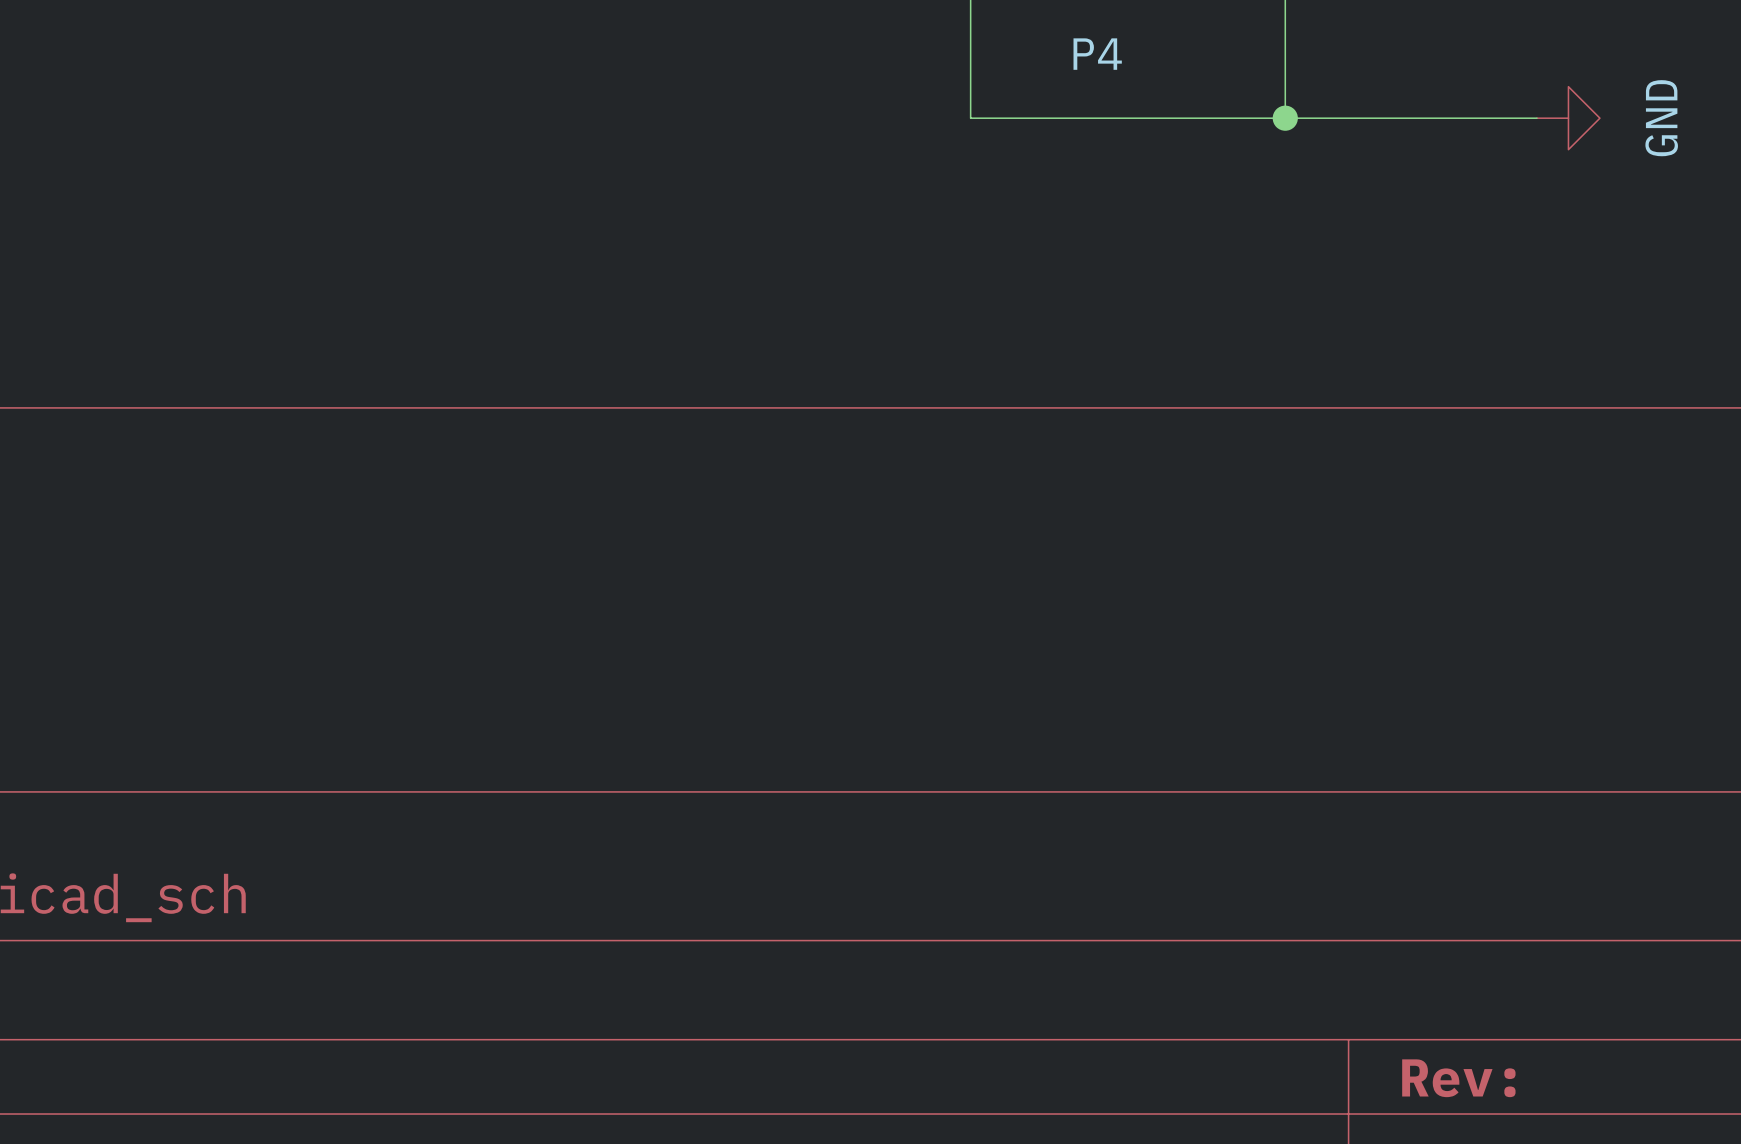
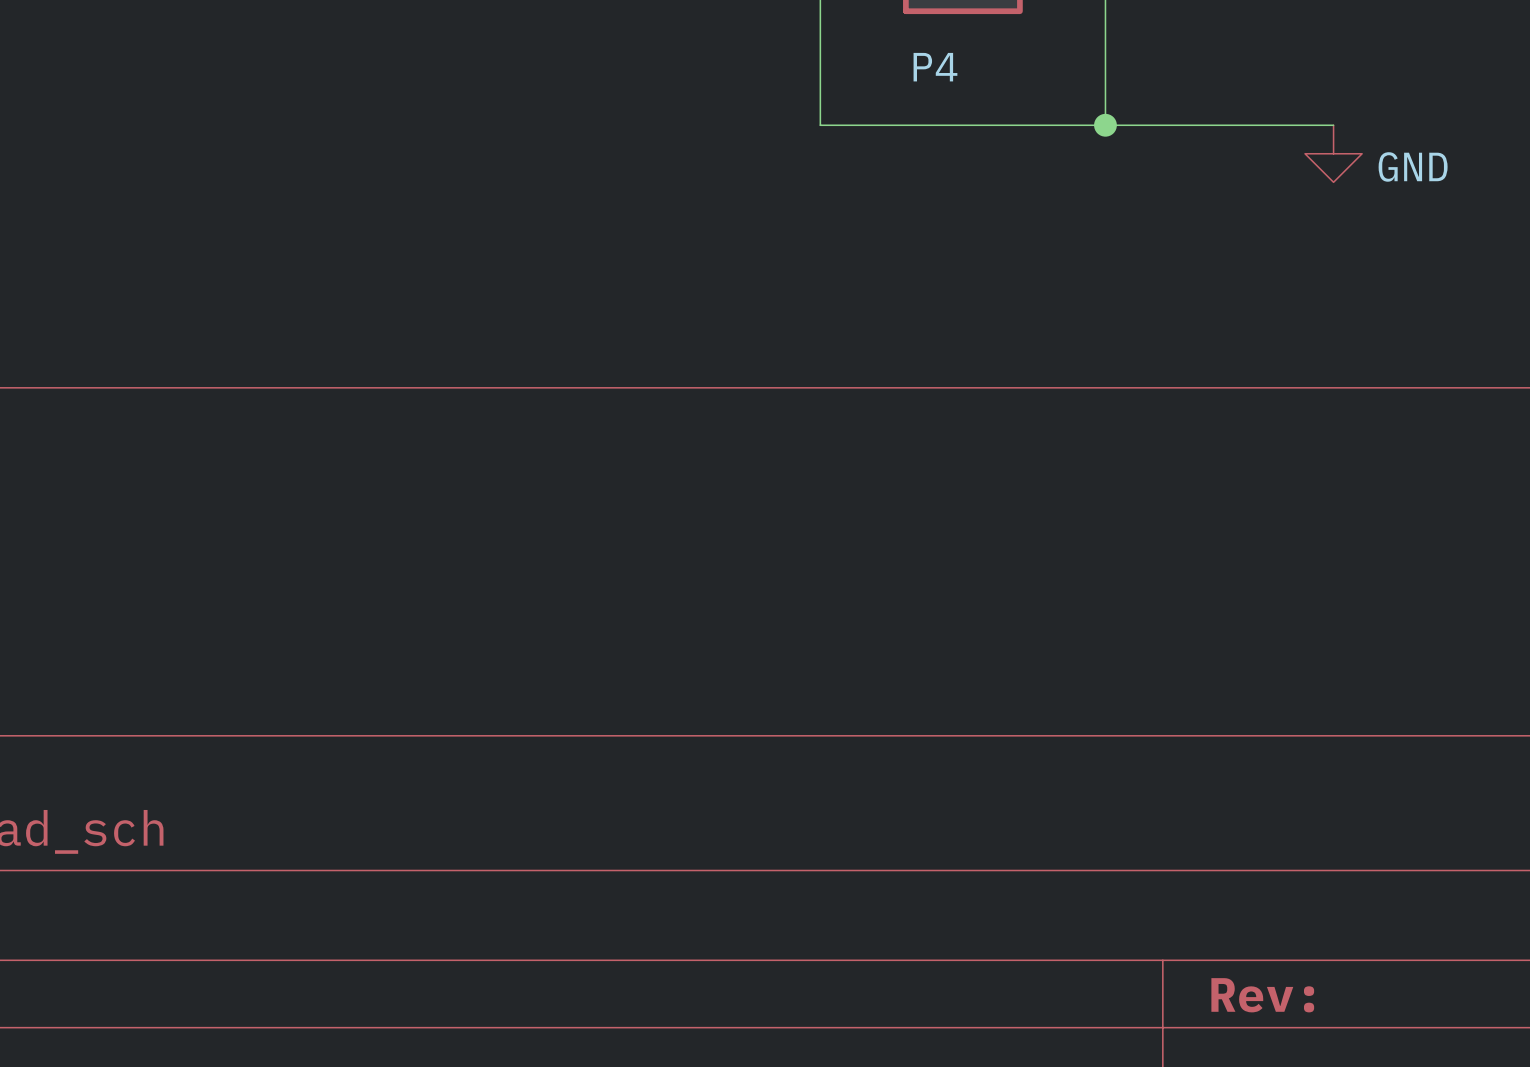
power symbol rotation: 0° (1568, 118) -> 90° clockwise (1333, 153)
power symbol position: GND (1568, 118) -> GND (1333, 153)

